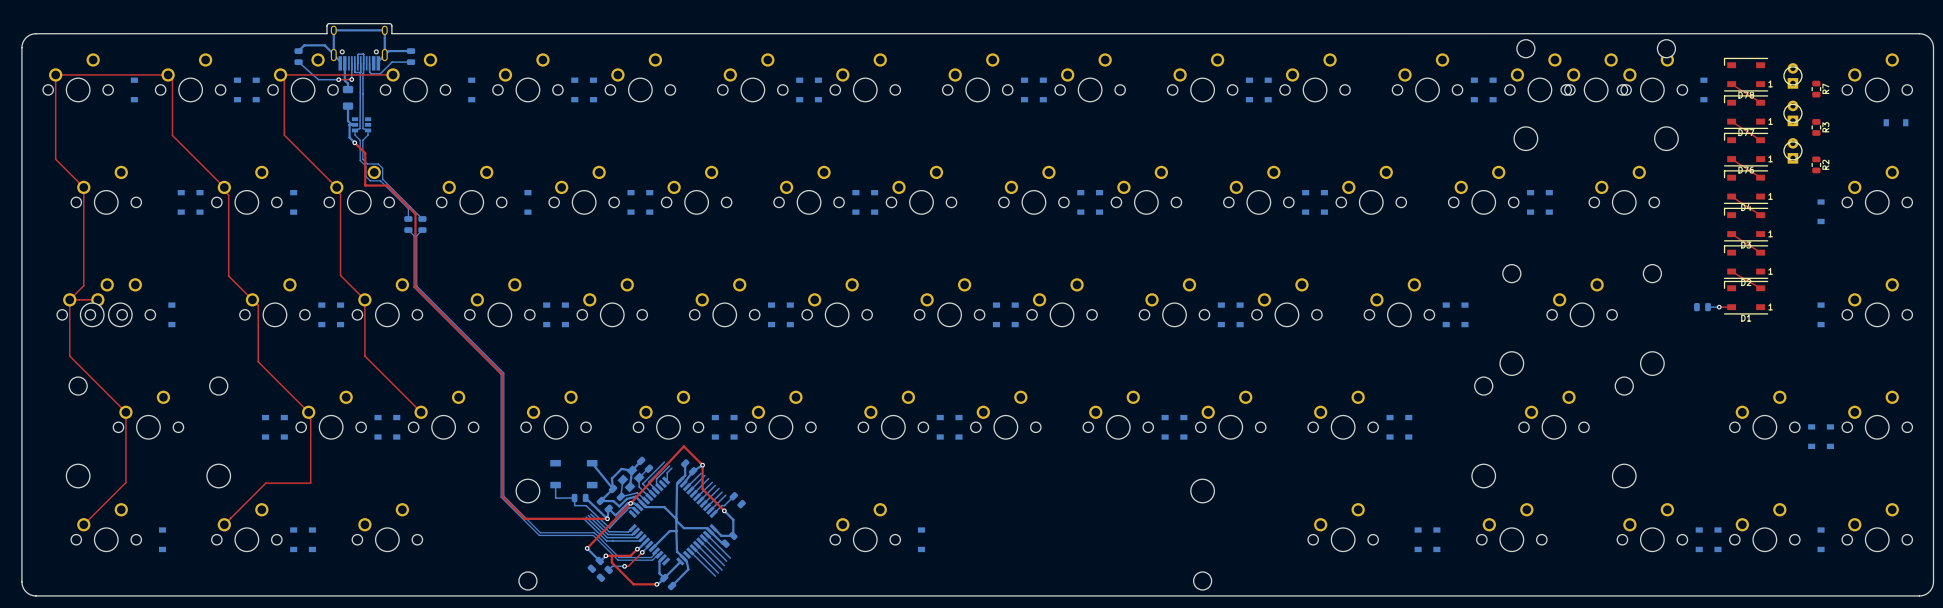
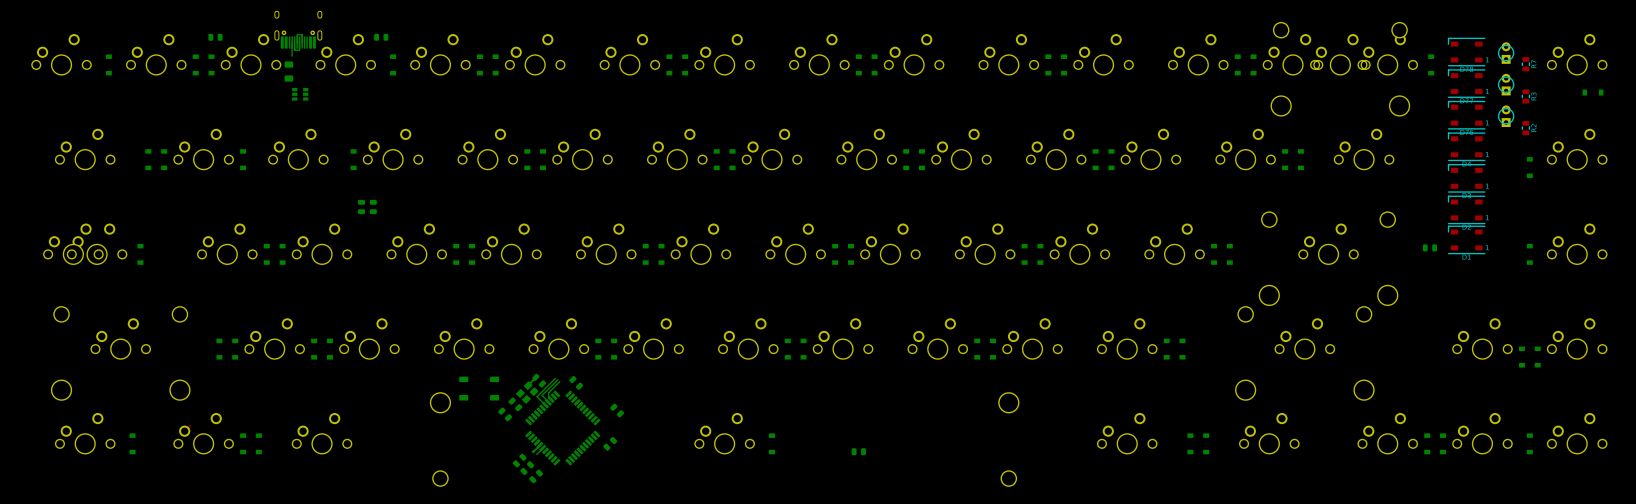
board edge: (21, 47) (21, 581) (24, 590) (32, 595) (1919, 595) (1928, 593) (1933, 585) (1933, 47) (1930, 39) (1923, 34) (391, 33) (391, 25) (389, 23) (329, 23) (327, 25) (326, 33) (34, 33) (24, 39) (21, 47) -> none
bottom track: (298, 51) (304, 45) (324, 45) (333, 54) -> none
bottom track: (411, 51) (388, 51) (378, 63) -> none
bottom track: (384, 55) (384, 30) (333, 30) (333, 55) (340, 63) -> none
part rotation: 0° (298, 56) -> 90° clockwise (215, 37)
part position: (298, 56) -> (215, 37)
part rotation: 0° (411, 56) -> 90° clockwise (381, 37)
part position: (411, 56) -> (381, 37)
bottom track: (298, 62) (318, 79) (338, 79) -> none
bottom track: (411, 62) (392, 62) (380, 73) (371, 73) (369, 63) -> none
bottom track: (344, 63) (344, 80) (348, 83) (348, 89) -> none
bottom track: (363, 63) (363, 128) (368, 130) (368, 135) (362, 140) (362, 159) (367, 164) (378, 164) (382, 168) (382, 179) (422, 218) -> none
bottom track: (360, 72) (360, 128) (355, 130) (355, 135) (360, 140) (360, 160) (365, 166) (365, 176) (370, 180) (380, 180) (408, 208) (408, 218) -> none
top track: (393, 74) (280, 74) (284, 78) (284, 135) (336, 187) (336, 190) (340, 194) (340, 275) (364, 299) (364, 356) (421, 412) -> none
via: (338, 79) -> none
top track: (351, 79) (338, 79) -> none
via: (351, 79) -> none
top track: (1731, 84) (1760, 102) -> none
bottom track: (348, 106) (348, 121) (355, 124) (349, 124) -> none
top track: (1731, 121) (1760, 140) -> none
bottom track: (349, 124) (349, 137) (354, 142) -> none
top track: (354, 142) (365, 153) (365, 185) (387, 185) (415, 214) (415, 287) (502, 374) (502, 496) (525, 518) (607, 518) -> none
via: (354, 142) -> none
top track: (1731, 159) (1760, 177) -> none
top track: (1731, 196) (1760, 215) -> none
part position: (527, 202) -> (353, 159)
part: (408, 224) -> none
part: (422, 224) -> none
bottom track: (408, 230) (414, 235) (414, 287) (501, 374) (501, 497) (539, 535) (593, 535) (618, 560) (652, 560) (659, 554) -> none
bottom track: (422, 230) (416, 235) (416, 286) (503, 373) (503, 496) (540, 532) (594, 532) (619, 557) (651, 557) (655, 551) -> none
top track: (1731, 234) (1760, 252) -> none
part: none -> (361, 207)
part: none -> (373, 207)
top track: (1731, 271) (1760, 288) -> none
top track: (69, 299) (83, 285) (83, 187) (55, 159) (55, 74) (168, 74) (172, 80) (172, 135) (224, 187) (224, 190) (228, 195) (228, 276) (258, 305) (258, 361) (308, 412) (310, 419) (310, 483) (265, 483) (230, 518) -> none
top track: (69, 299) (97, 299) -> none
top track: (69, 299) (69, 356) (125, 412) (125, 482) (83, 524) -> none
bottom track: (1708, 307) (1719, 307) -> none
top track: (1719, 307) (1731, 307) -> none
via: (1719, 307) -> none
bottom track: (592, 463) (613, 488) -> none
bottom track: (685, 463) (685, 475) (677, 483) (676, 520) -> none
bottom track: (702, 465) (693, 471) (683, 483) -> none
via: (702, 465) -> none
bottom track: (648, 468) (639, 477) (639, 486) (649, 497) -> none
bottom track: (671, 468) (667, 472) (666, 480) -> none
bottom track: (701, 473) (686, 487) -> none
bottom track: (704, 475) (690, 490) -> none
bottom track: (708, 478) (693, 493) -> none
bottom track: (622, 479) (620, 496) (637, 492) (645, 500) -> none
bottom track: (712, 482) (696, 497) -> none
bottom track: (555, 485) (555, 498) (574, 497) (574, 505) (585, 505) (609, 528) (629, 507) (633, 507) (636, 510) -> none
bottom track: (715, 485) (700, 500) -> none
bottom track: (629, 486) (632, 470) (621, 468) (611, 478) (613, 488) -> none
bottom track: (613, 488) (600, 500) (613, 501) (619, 506) (626, 498) (635, 496) (645, 507) (664, 507) (676, 519) -> none
bottom track: (719, 488) (703, 503) -> none
bottom track: (722, 492) (706, 507) -> none
bottom track: (725, 495) (710, 510) -> none
bottom track: (733, 496) (713, 513) -> none
part: (580, 497) -> none
bottom track: (585, 497) (607, 518) (608, 508) (615, 515) (627, 503) (634, 503) (639, 507) -> none
via: (630, 503) -> none
bottom track: (724, 510) (733, 519) (733, 535) (721, 535) (713, 528) -> none
top track: (724, 510) (702, 489) (702, 465) (683, 446) (587, 548) -> none
via: (724, 510) -> none
bottom track: (590, 514) (609, 531) (628, 532) (632, 528) -> none
bottom track: (588, 515) (608, 534) (632, 534) (636, 531) -> none
bottom track: (585, 517) (607, 537) (636, 537) (639, 534) -> none
bottom track: (583, 518) (606, 540) (639, 540) (642, 538) -> none
via: (607, 518) -> none
bottom track: (676, 520) (683, 528) (707, 528) (722, 543) (725, 543) -> none
bottom track: (676, 520) (676, 531) -> none
bottom track: (676, 531) (669, 531) (652, 548) -> none
bottom track: (676, 531) (677, 551) (686, 561) (688, 569) (672, 586) -> none
bottom track: (706, 534) (730, 558) -> none
bottom track: (703, 538) (726, 561) -> none
bottom track: (700, 541) (724, 565) -> none
bottom track: (696, 544) (722, 570) -> none
bottom track: (587, 548) (599, 560) (605, 555) -> none
via: (587, 548) -> none
bottom track: (693, 548) (718, 573) -> none
top track: (637, 549) (630, 555) (605, 555) -> none
via: (637, 549) -> none
part: none -> (858, 451)
bottom track: (690, 551) (715, 576) -> none
top track: (642, 552) (628, 566) (624, 566) -> none
via: (642, 552) -> none
via: (605, 555) -> none
top track: (611, 555) (611, 562) (633, 584) (656, 584) -> none
bottom track: (662, 558) (659, 561) (659, 573) (664, 578) -> none
part: none -> (519, 460)
bottom track: (680, 561) (656, 584) -> none
part: (595, 564) -> none
bottom track: (624, 566) (612, 566) (608, 569) -> none
via: (624, 566) -> none
part: none -> (527, 468)
part: (604, 573) -> none
part: none -> (536, 476)
part: (668, 582) -> none
via: (656, 584) -> none

